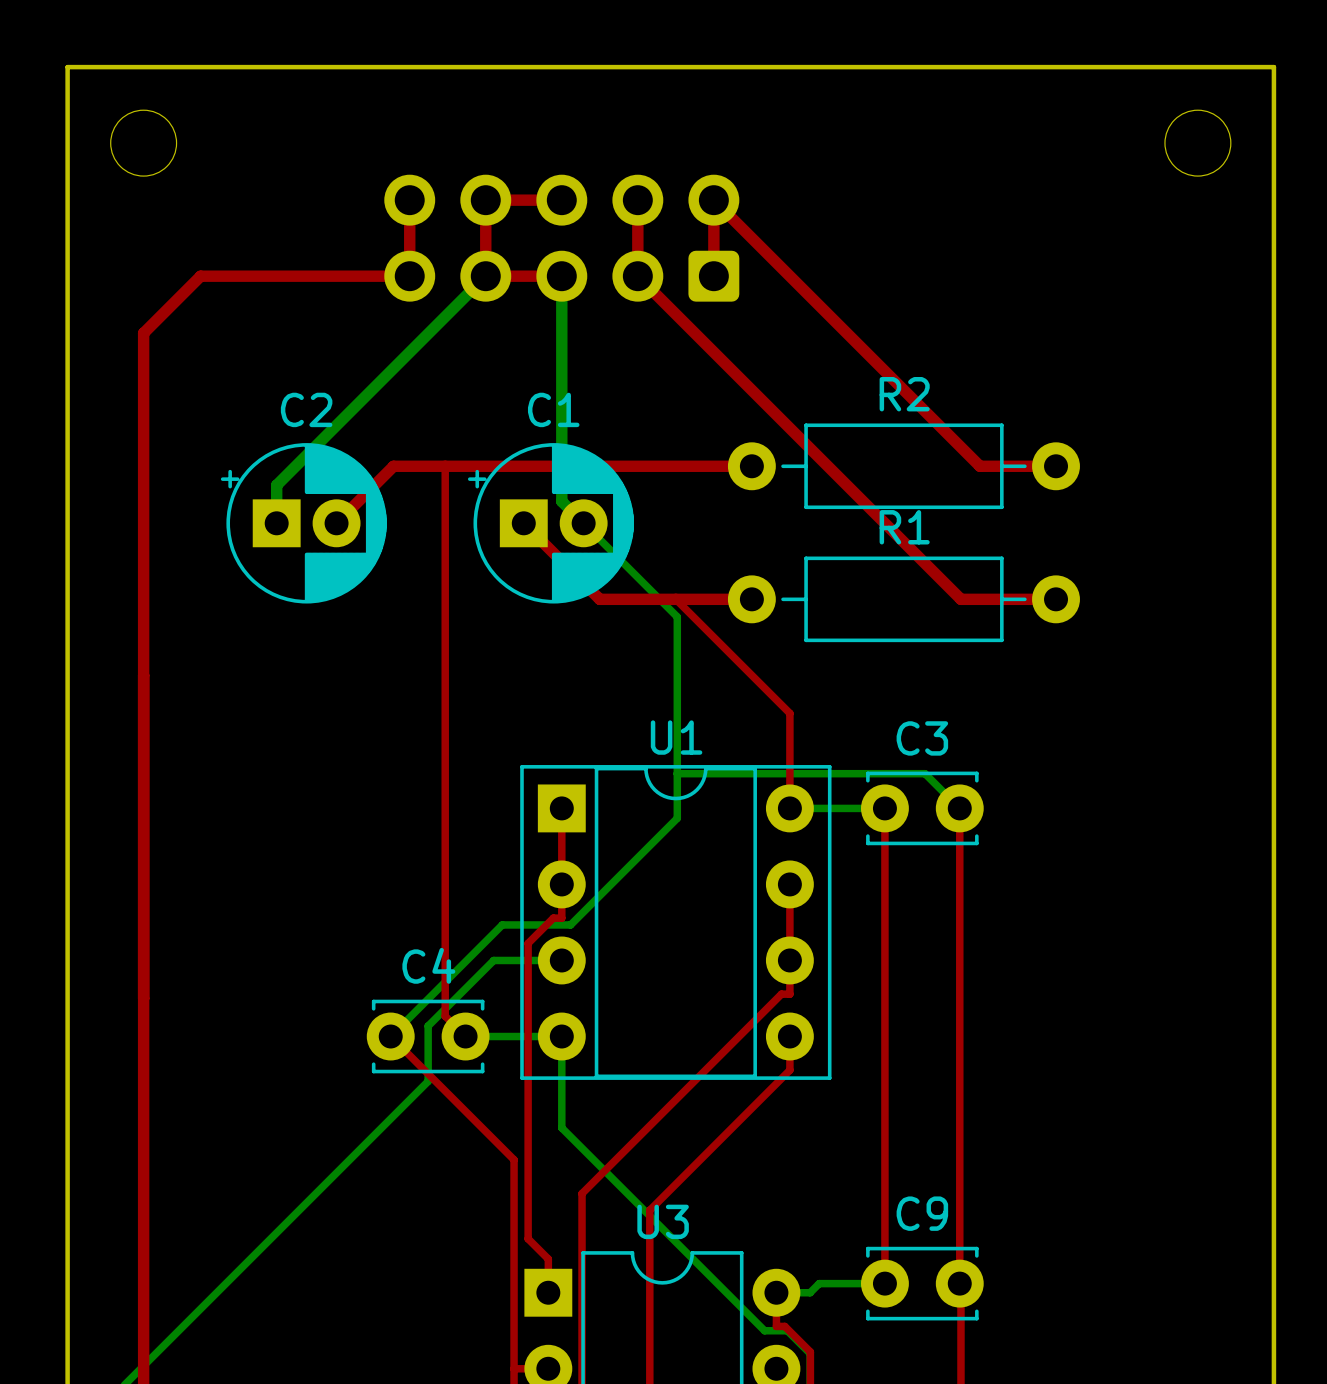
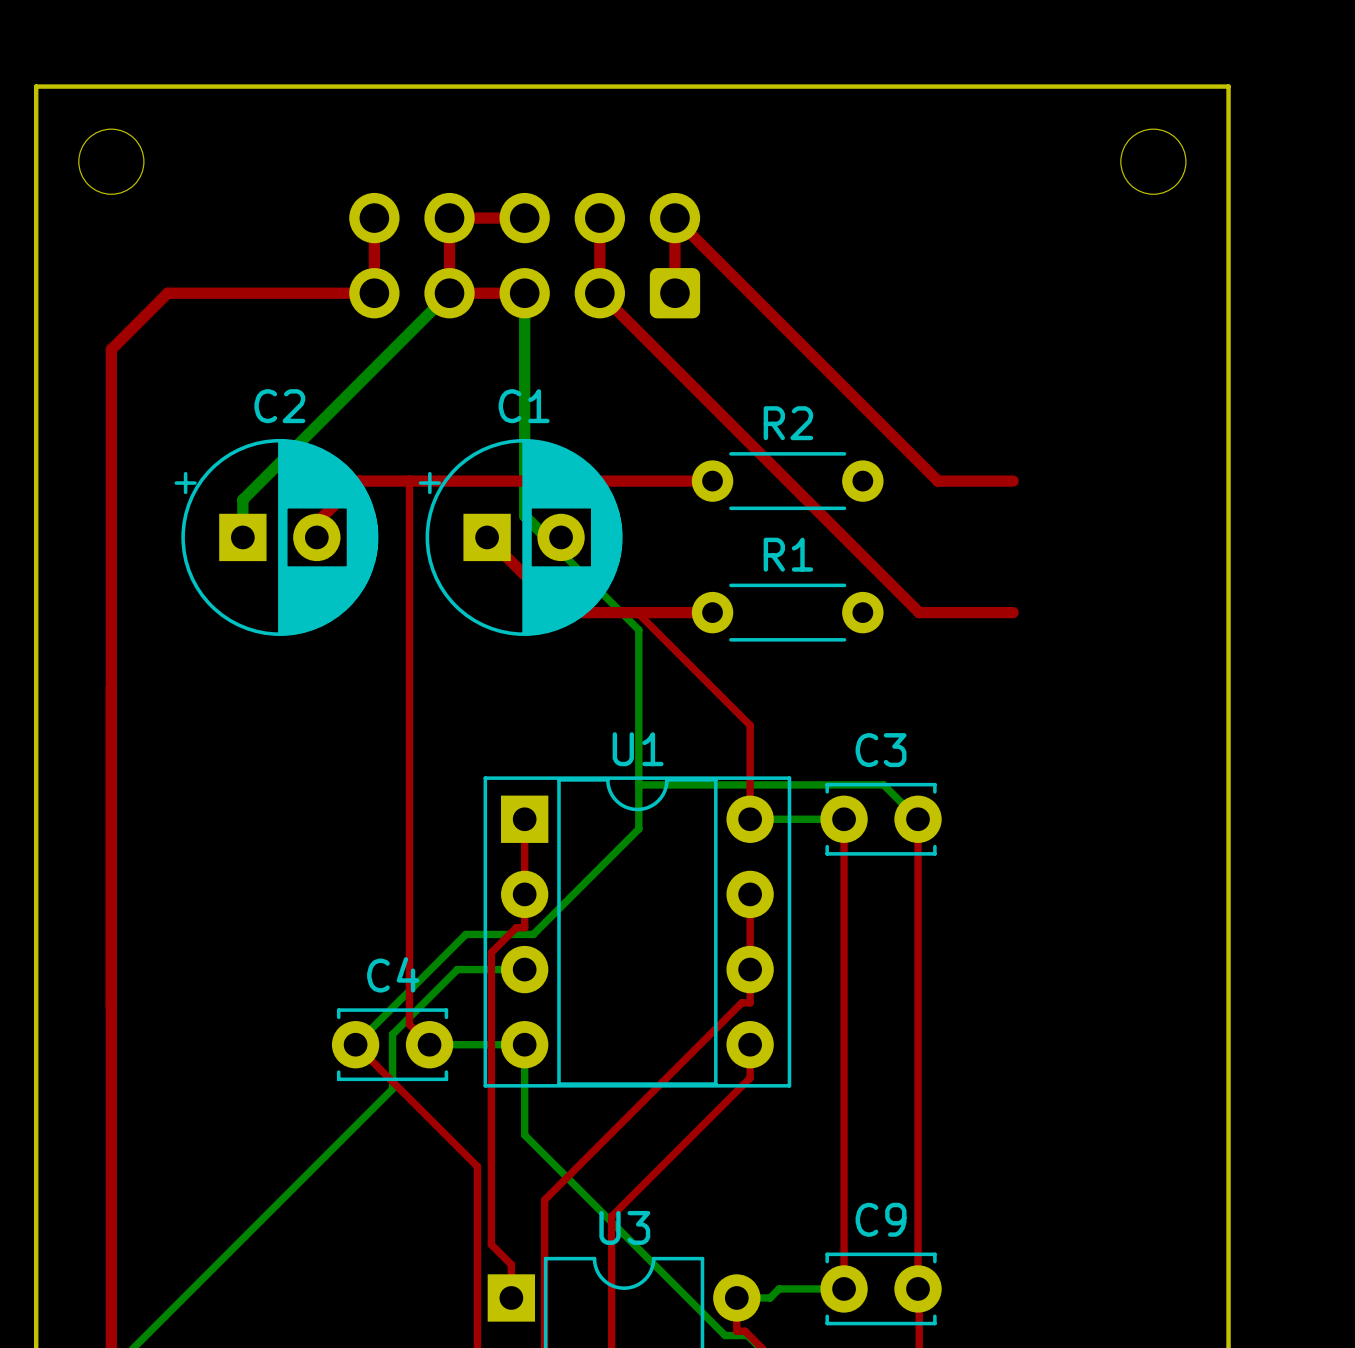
R2 footprint: [727, 423, 1080, 510] -> [691, 452, 884, 511]
C2 footprint: [220, 443, 387, 604] -> [174, 438, 379, 636]
C1 footprint: [467, 443, 634, 604] -> [418, 438, 623, 636]
R1 footprint: [727, 556, 1080, 643] -> [691, 583, 884, 642]

